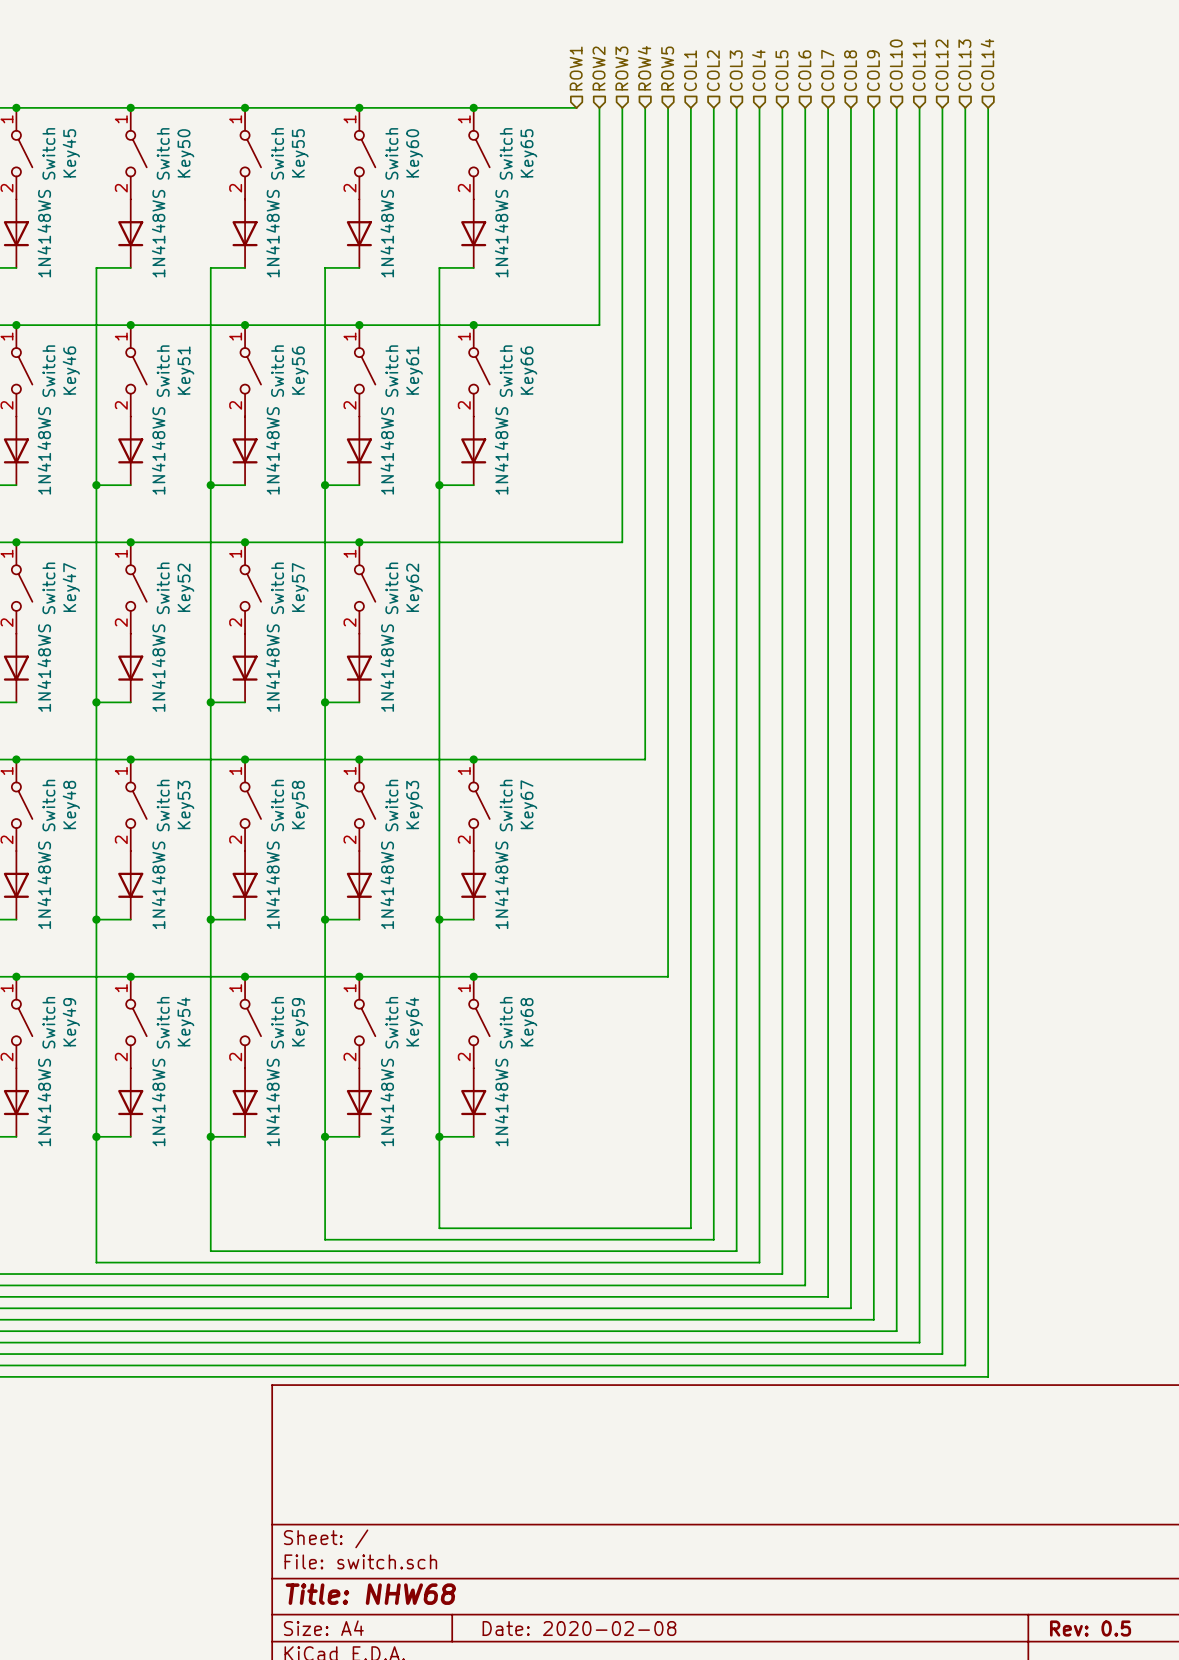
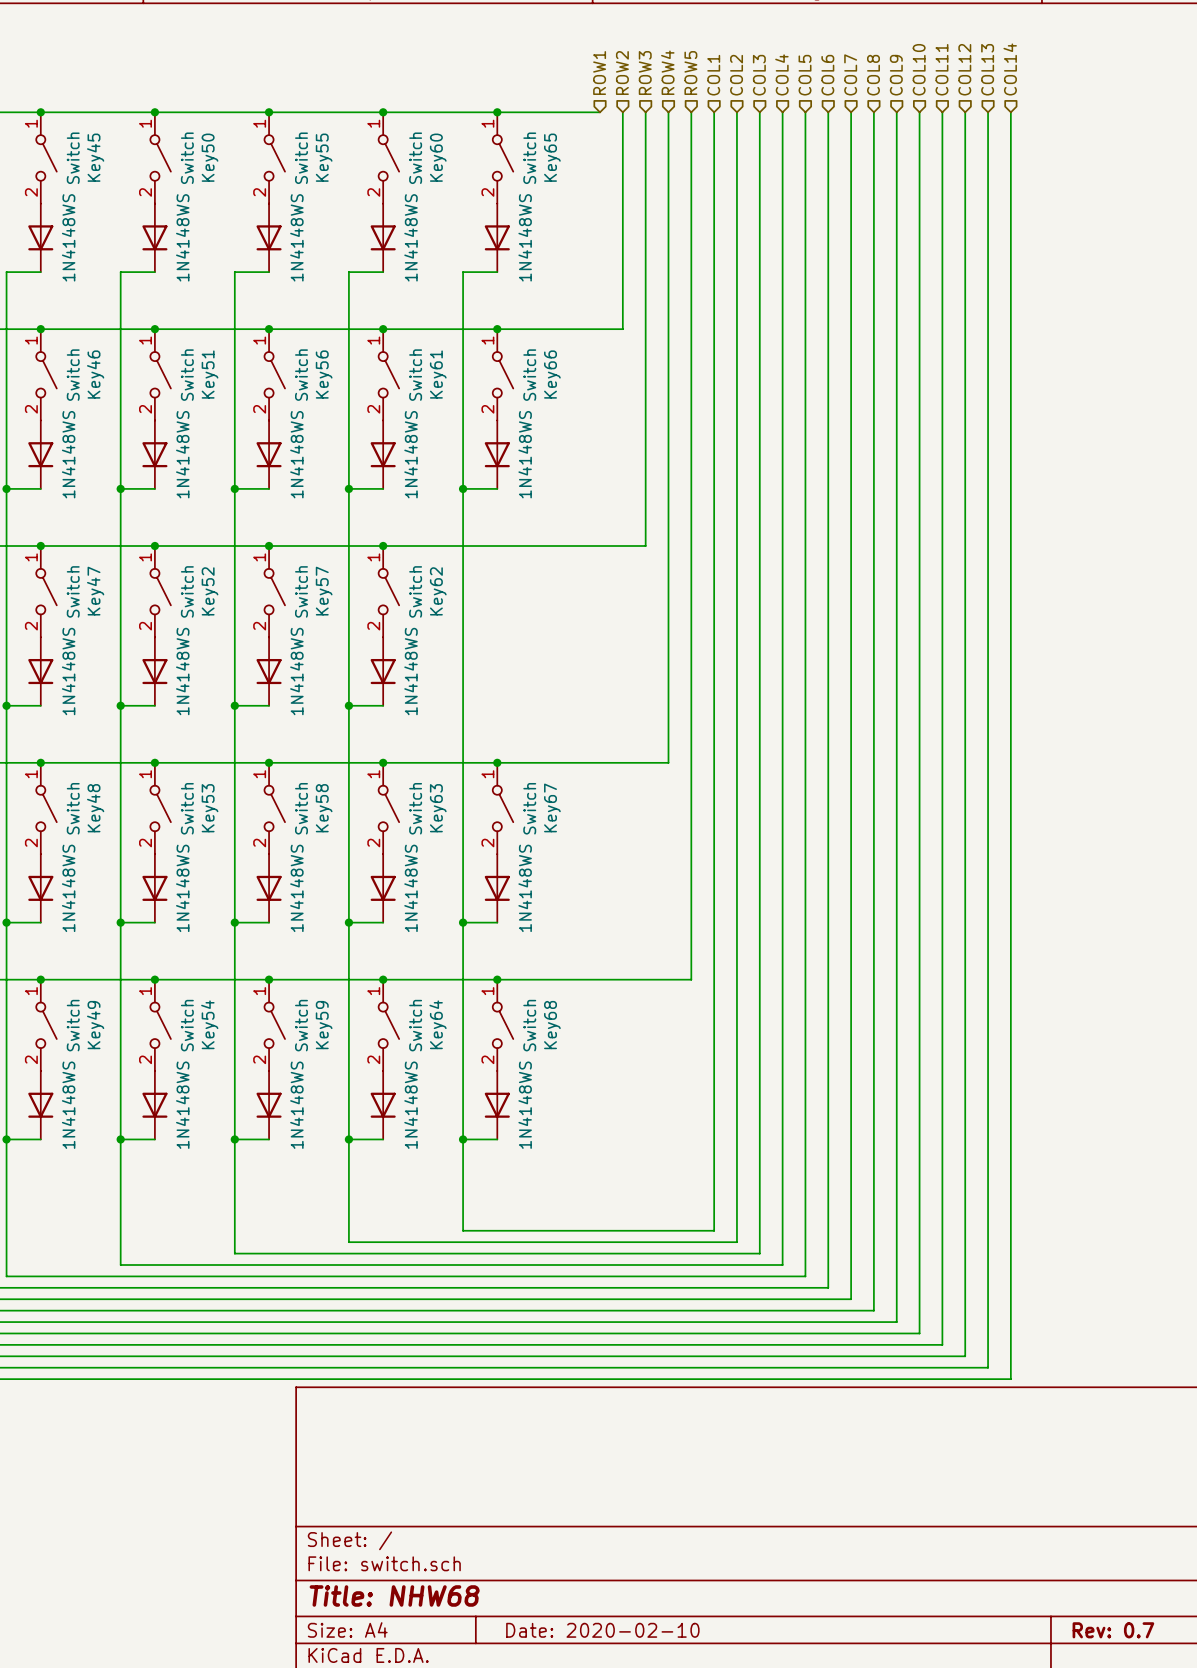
title block: Date: 2020-02-08 (579, 1628) -> Date: 2020-02-10 (602, 1630)
title block: Rev: 0.5 (1090, 1628) -> Rev: 0.7 (1113, 1630)

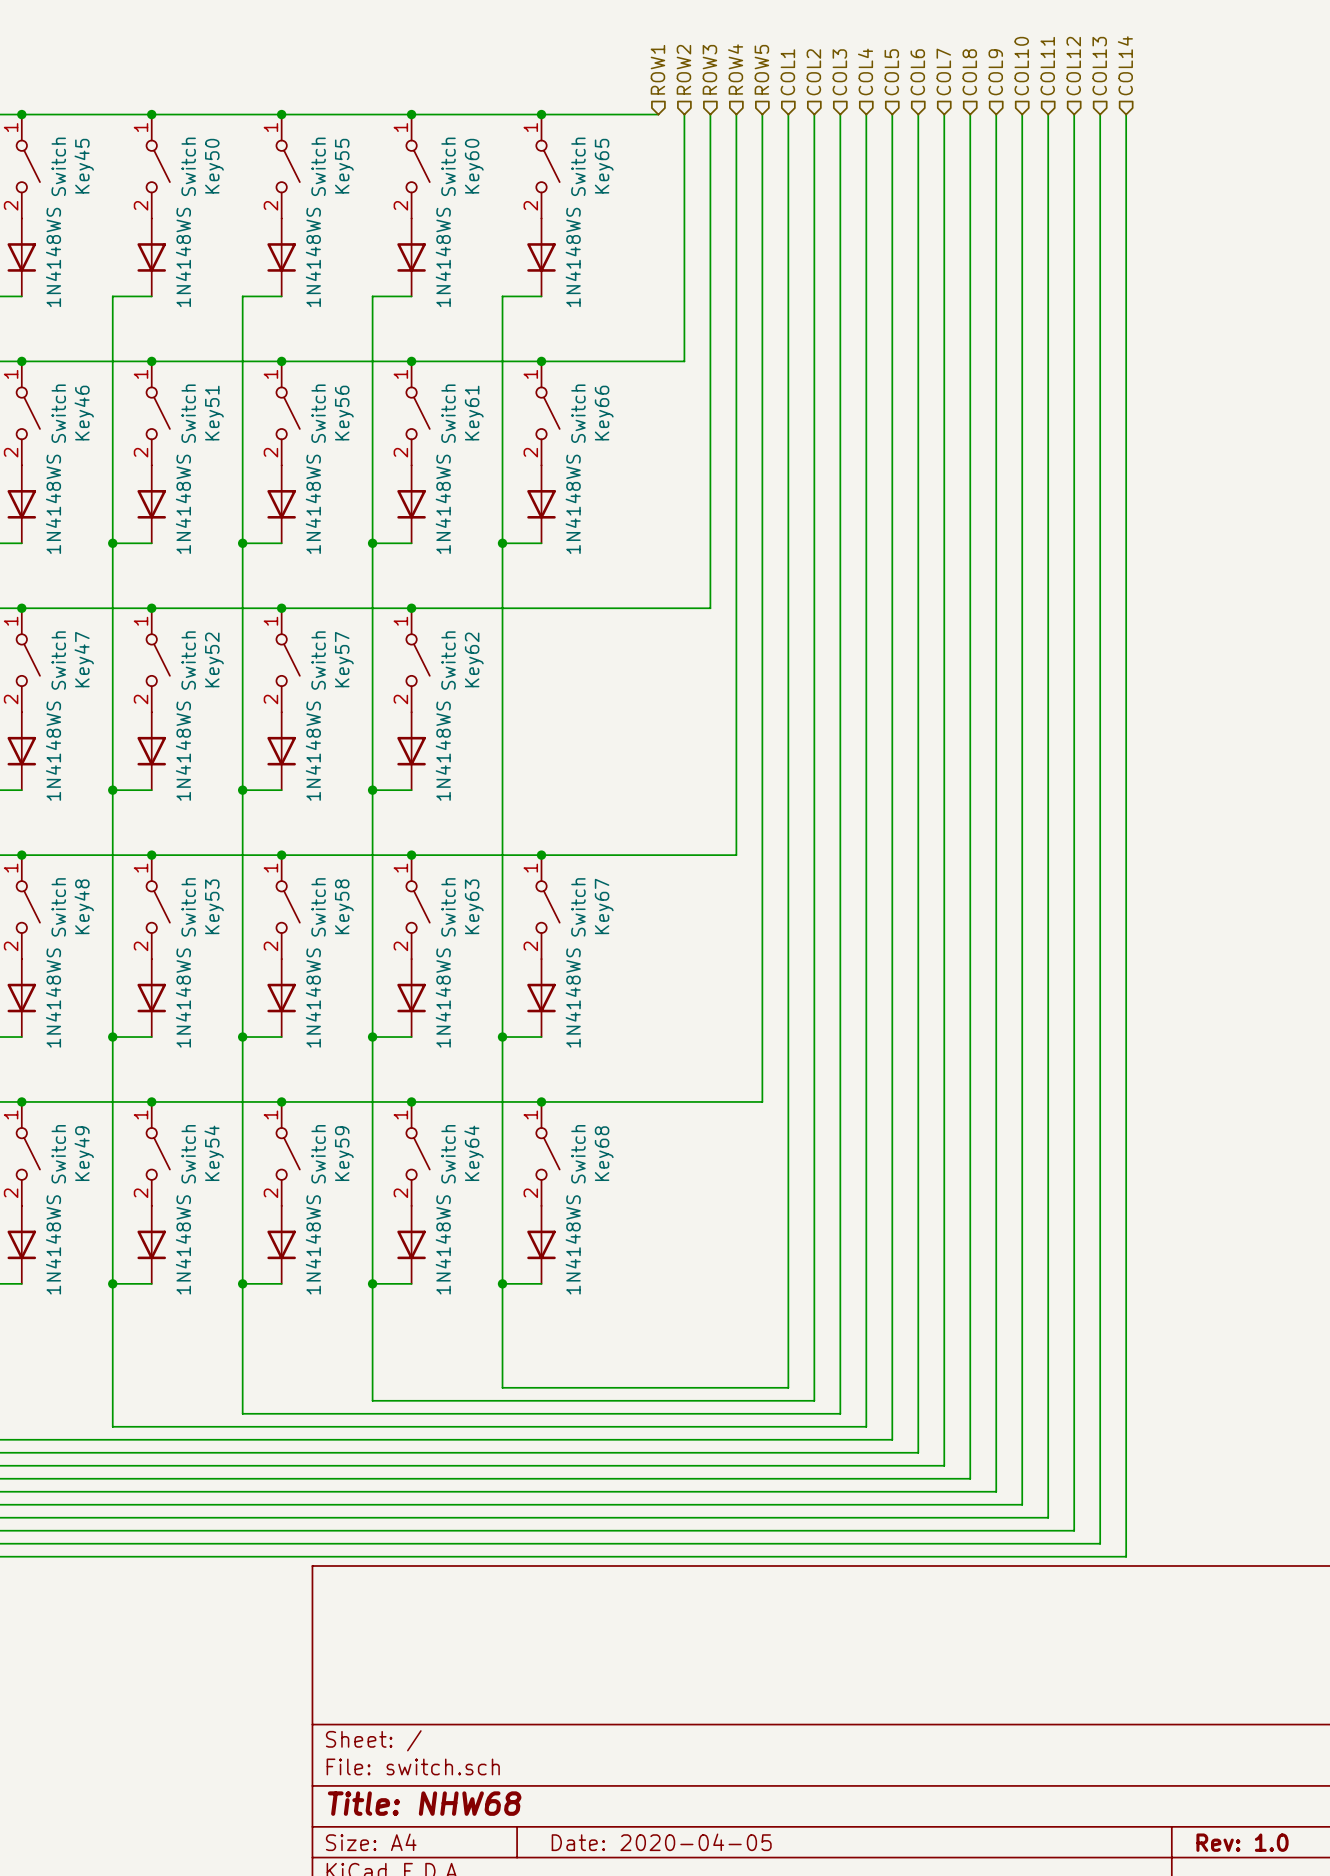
title block: Date: 2020-02-10 (602, 1630) -> Date: 2020-04-05 (661, 1842)
title block: Rev: 0.7 (1113, 1630) -> Rev: 1.0 (1242, 1842)

